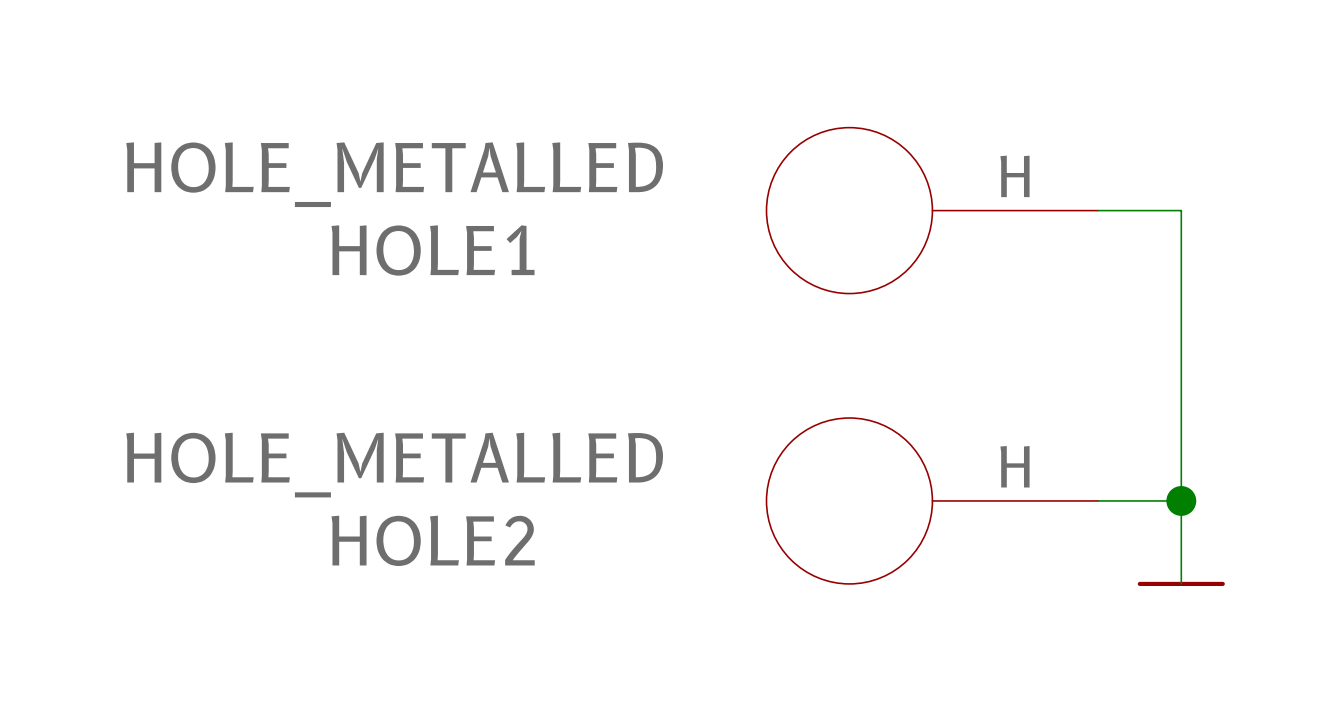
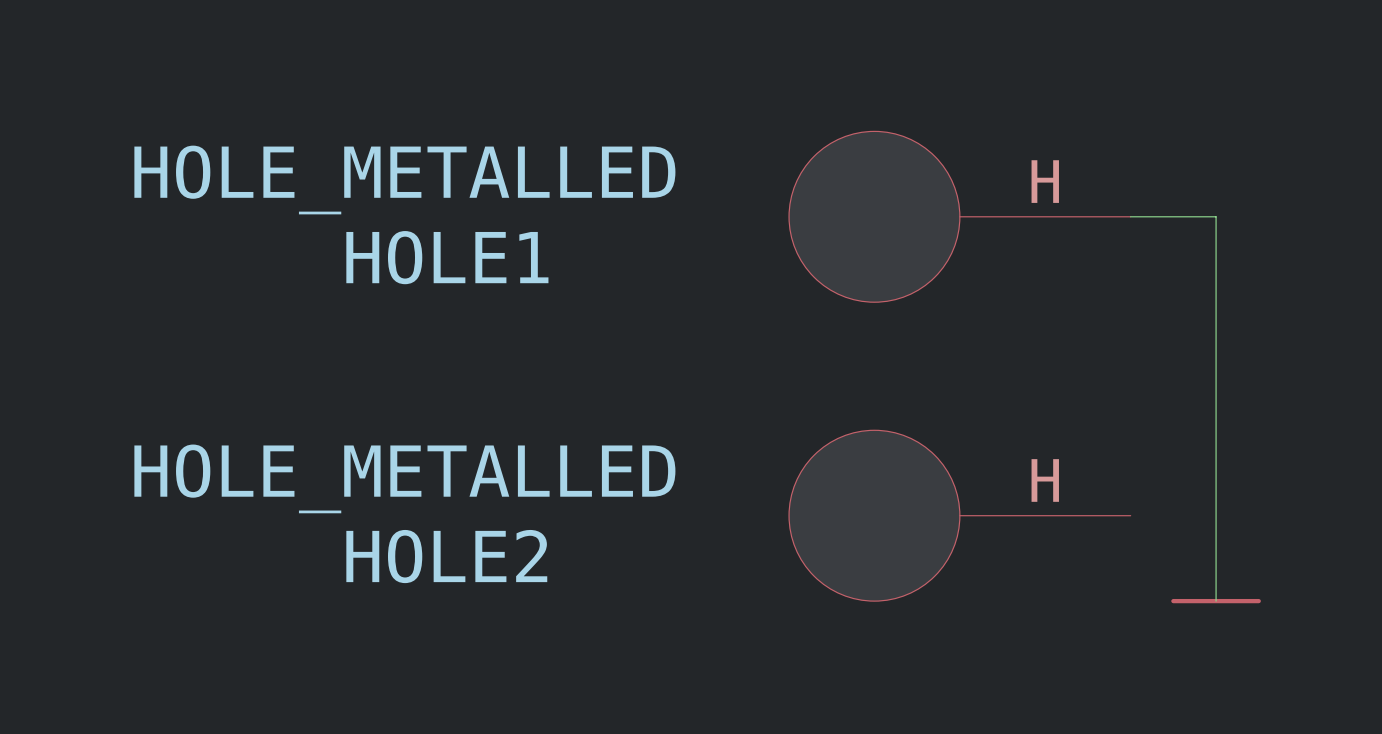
wire: (1098, 500) (1181, 500) -> none
junction: (1181, 500) -> none

